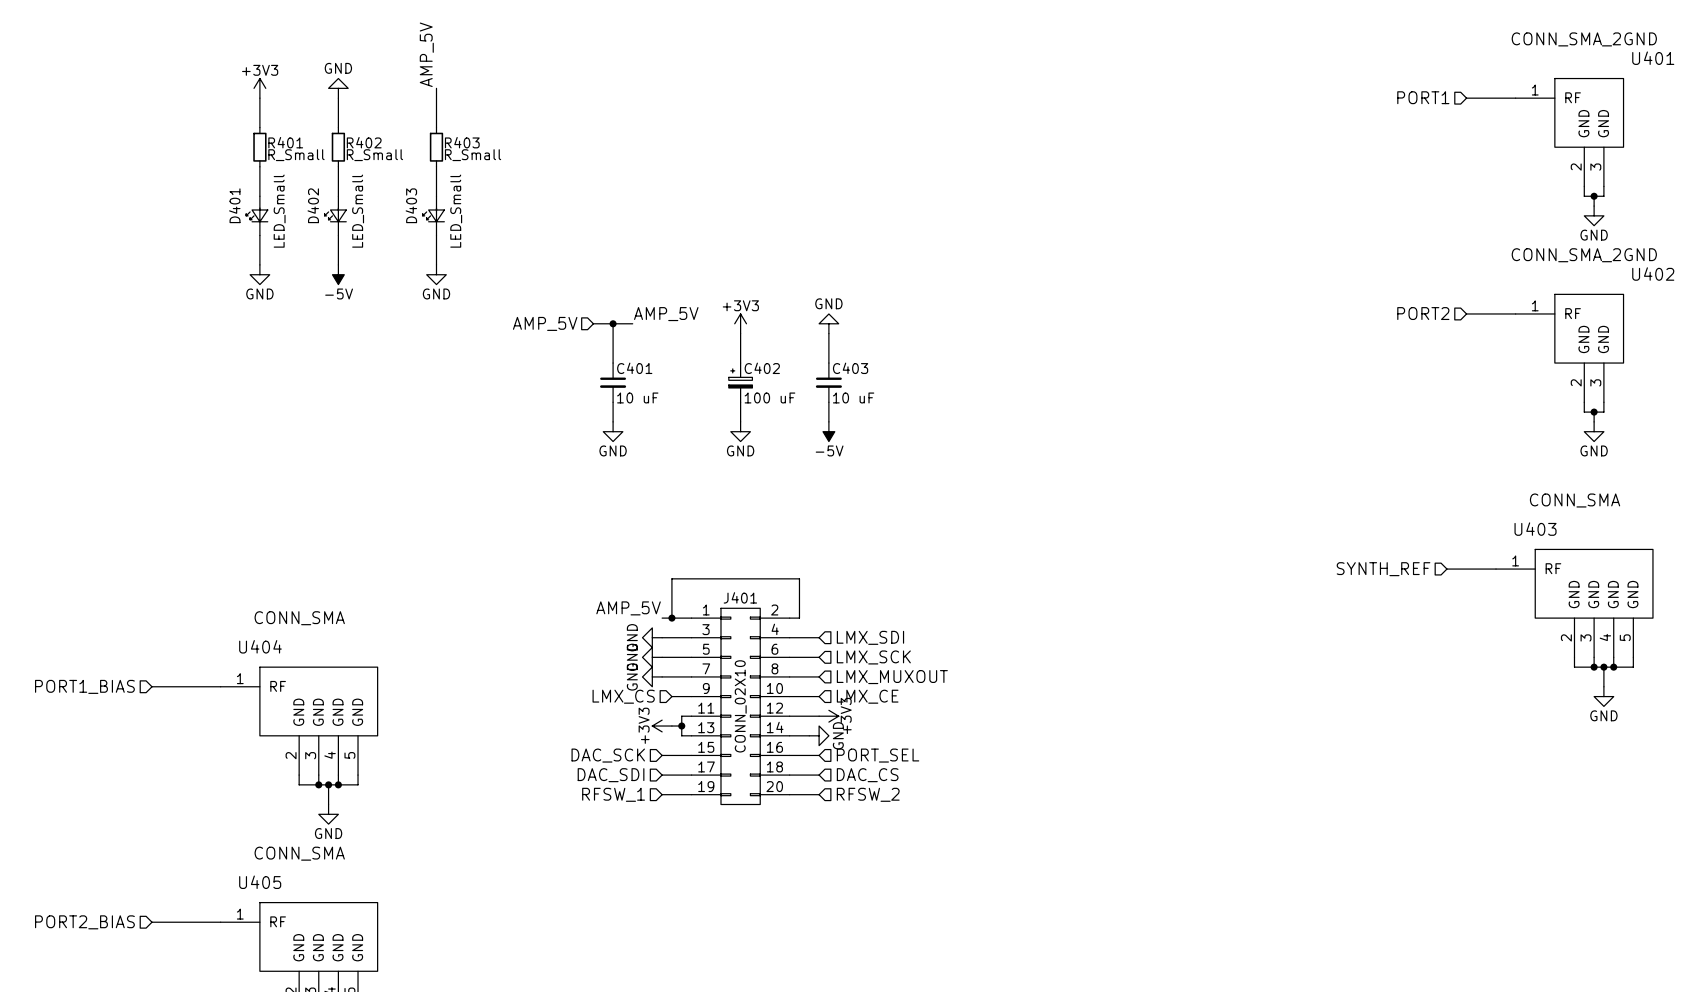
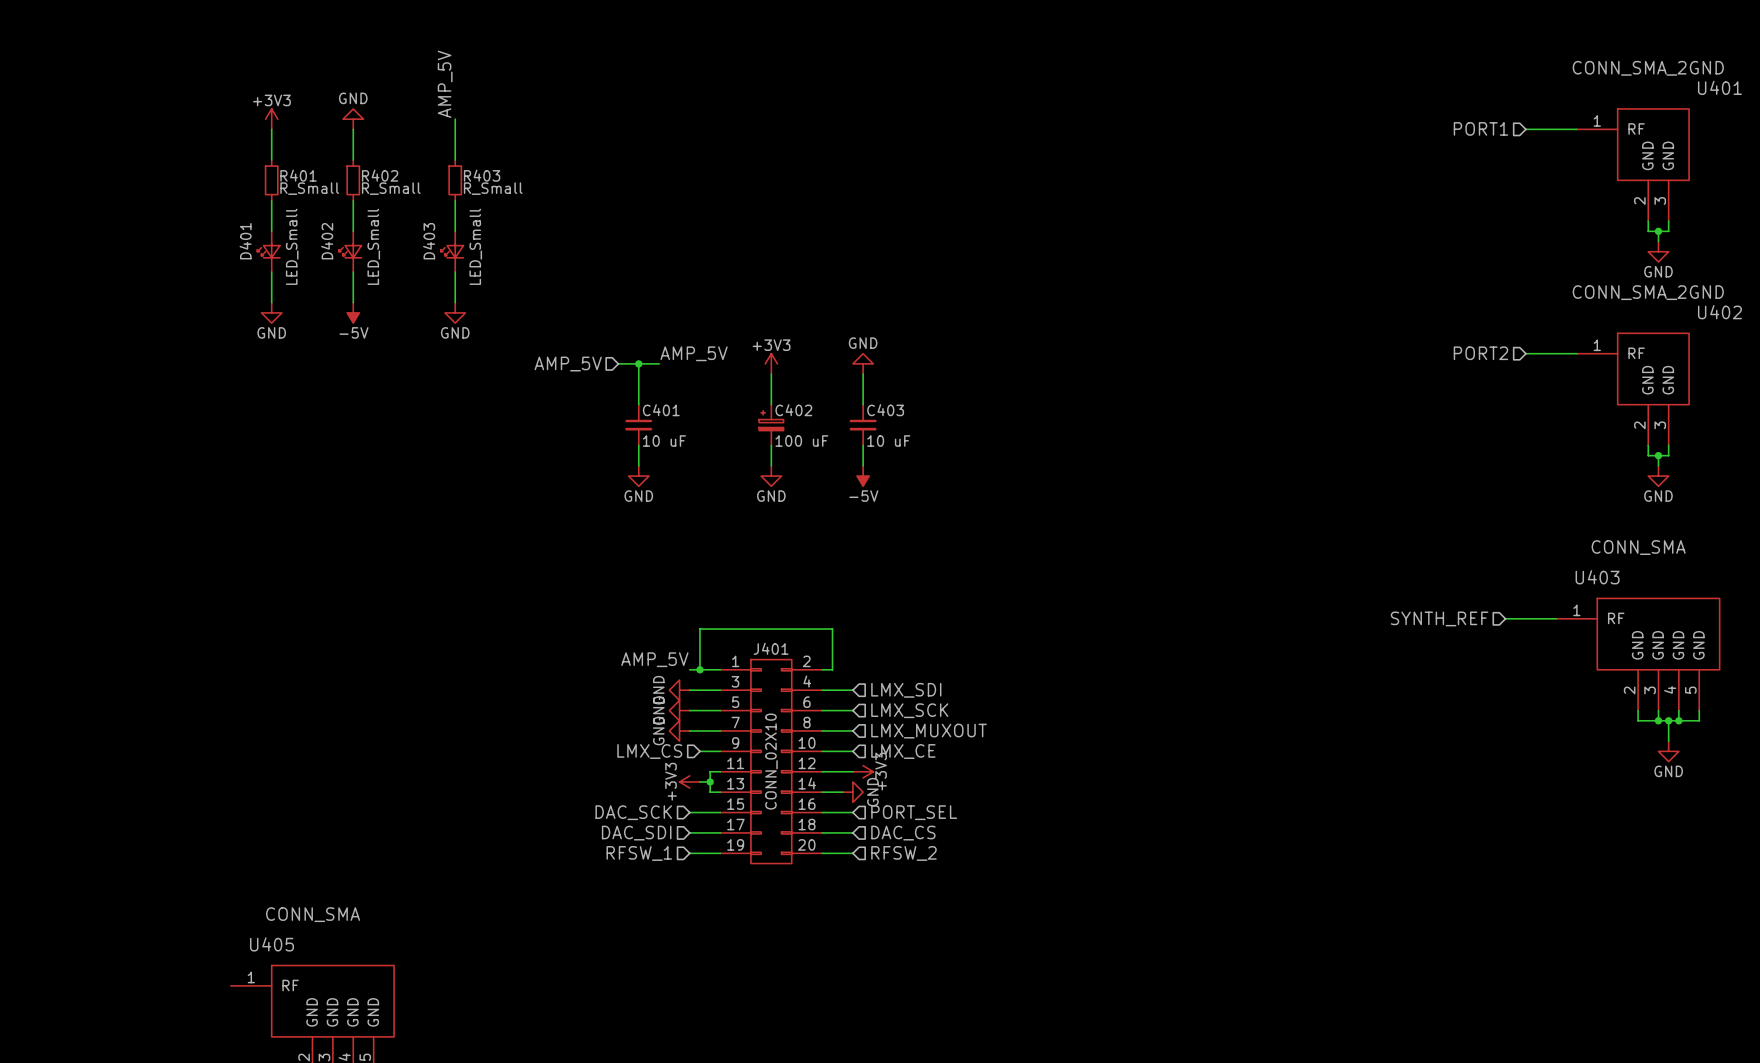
hierarchical label: PORT1_BIAS (84, 686) -> none
wire: (151, 686) (220, 686) -> none
U404: CONN_SMA (299, 721) -> none
wire: (299, 775) (299, 784) (358, 784) (358, 775) -> none
wire: (318, 775) (318, 784) -> none
wire: (338, 775) (338, 784) -> none
junction: (318, 784) -> none
wire: (328, 784) (328, 804) -> none
junction: (328, 784) -> none
junction: (338, 784) -> none
power symbol: GND (328, 814) -> none
hierarchical label: PORT2_BIAS (84, 922) -> none
wire: (151, 922) (220, 922) -> none

